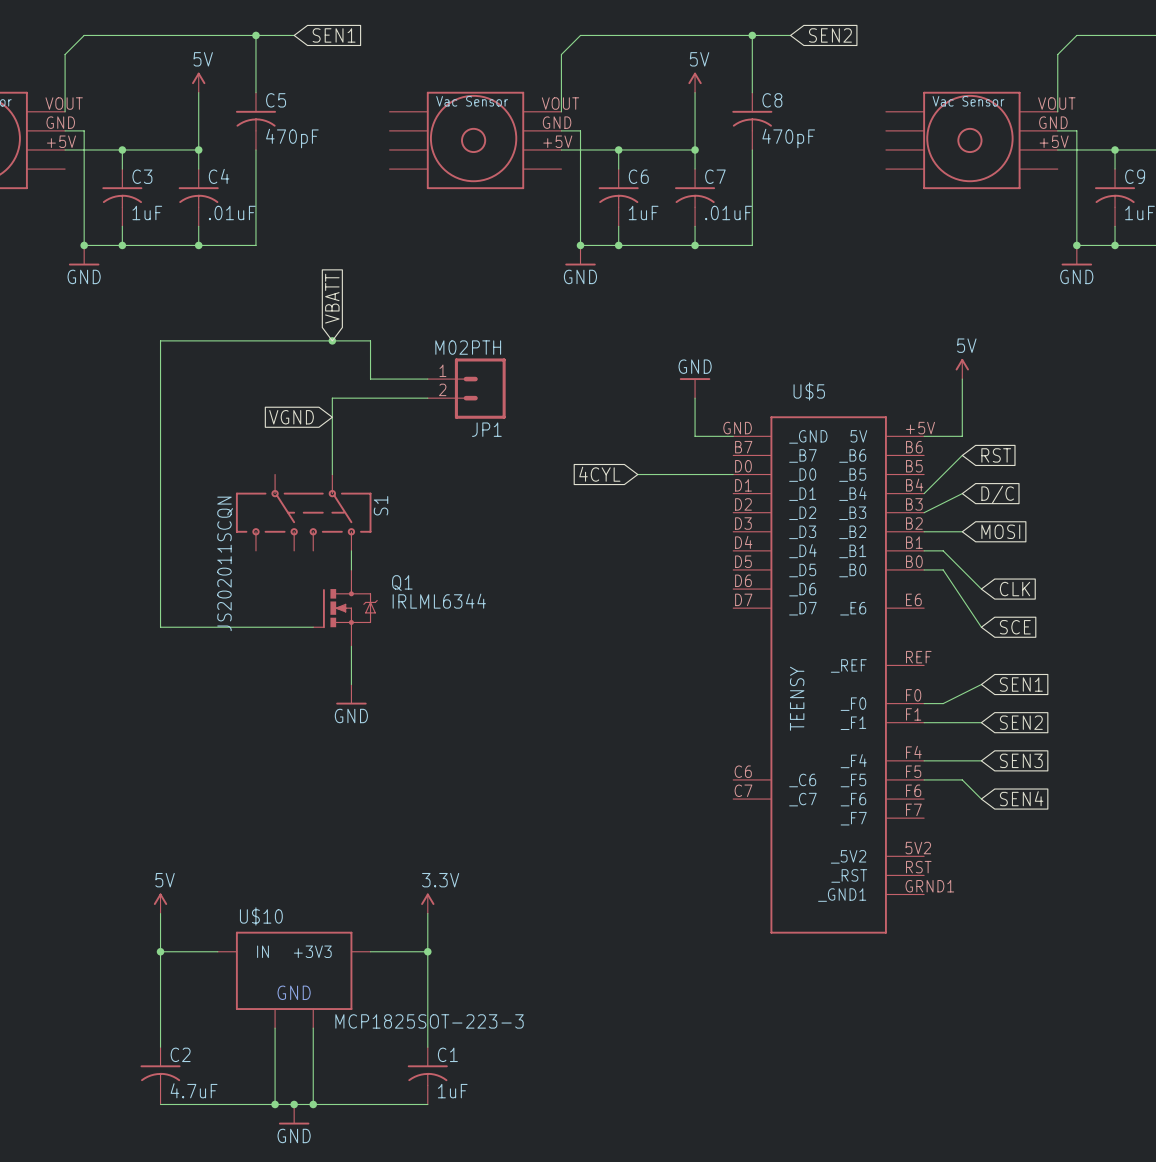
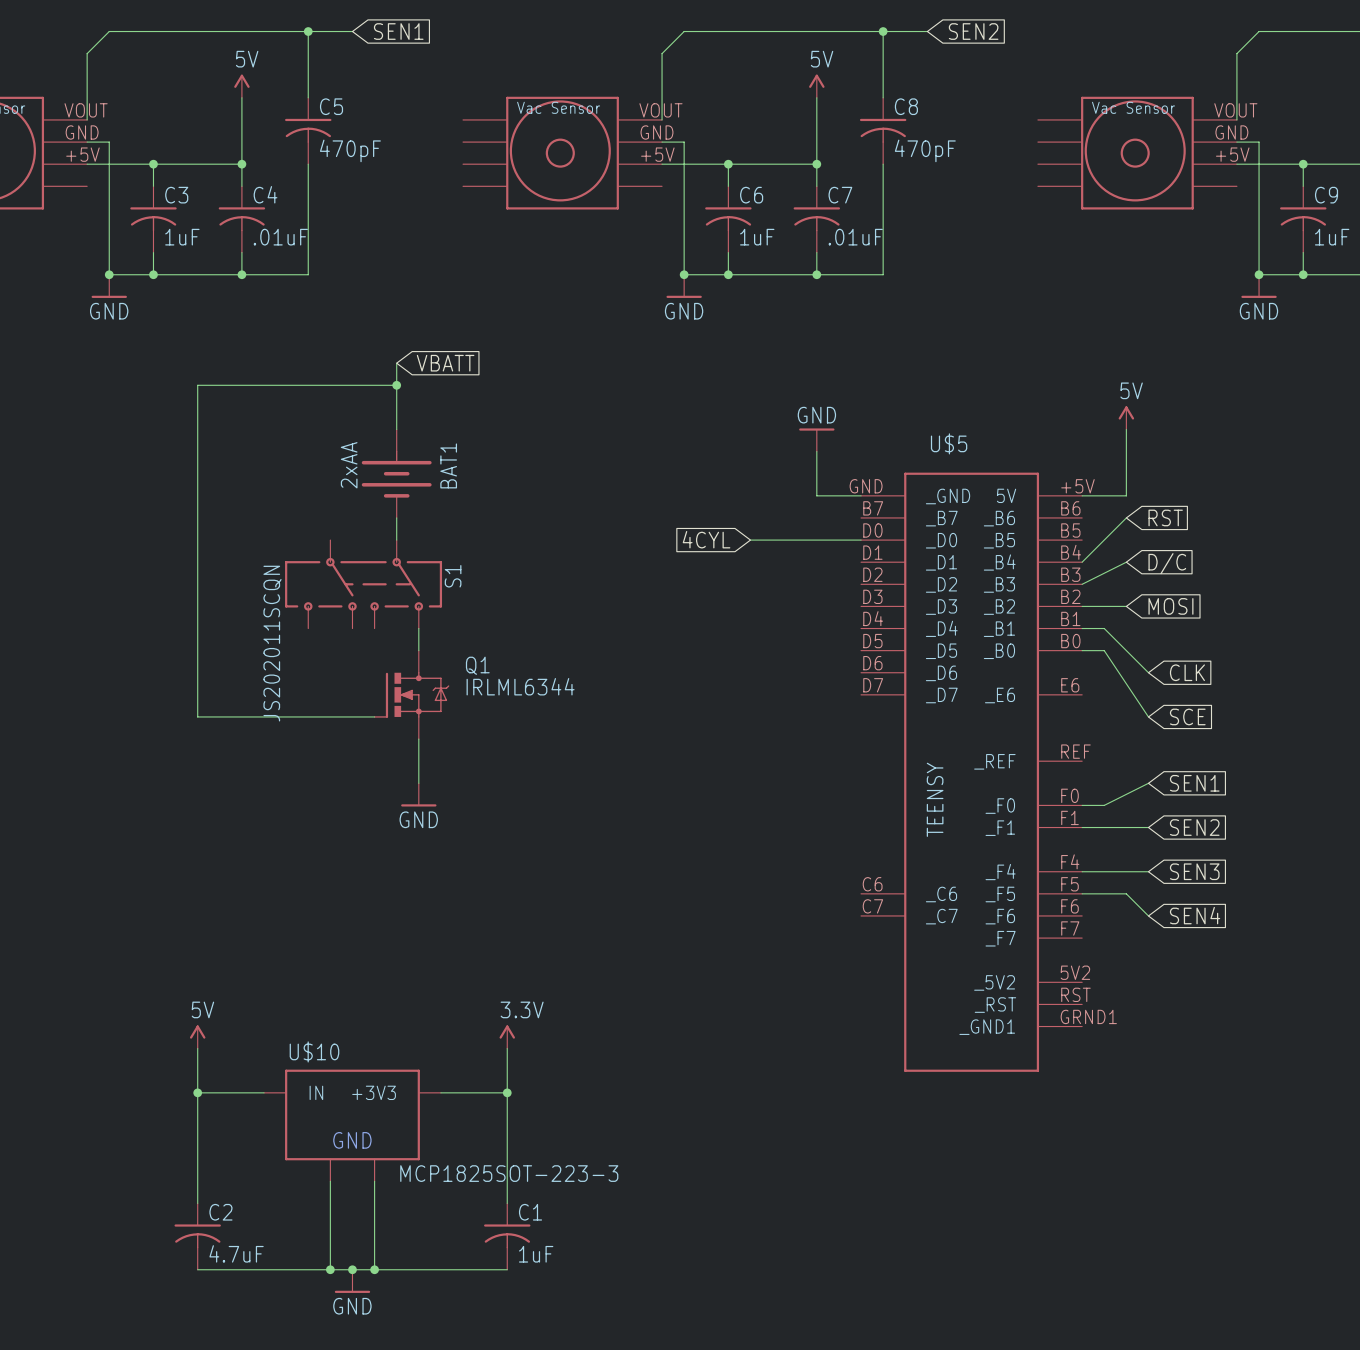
global label rotation: 0° (332, 298) -> 90° clockwise (445, 363)
wire: none -> (396, 363) (396, 429)
wire: (332, 340) (370, 340) (370, 379) (427, 379) -> none
JP1: M02PTH (466, 388) -> none
wire: (427, 398) (332, 398) (332, 455) -> none
global label: VGND (291, 417) -> none
BAT1: none -> 2xAA (396, 473)

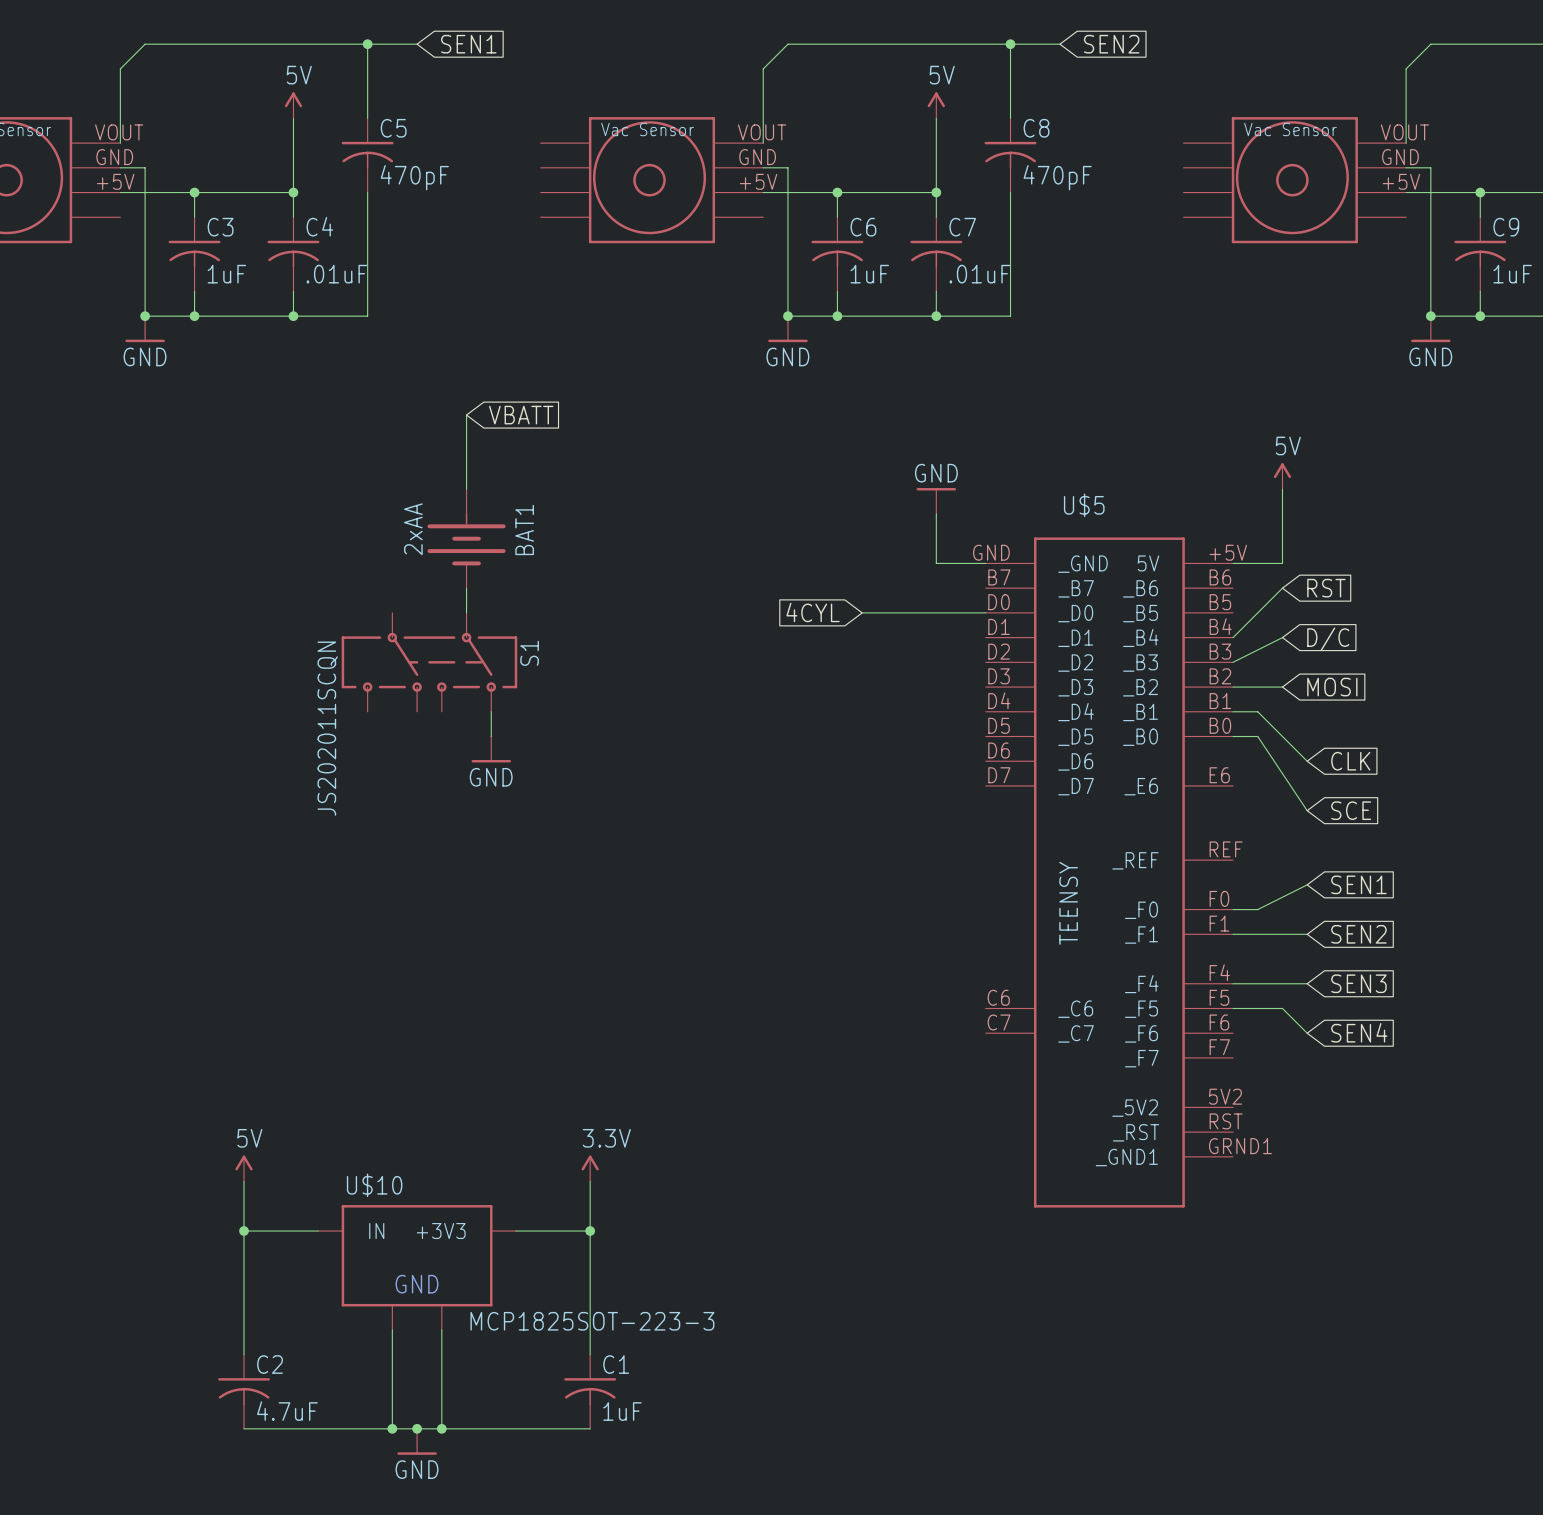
wire: (396, 385) (197, 385) (197, 716) (374, 716) -> none
junction: (396, 385) -> none
Q1: IRLML6344 (411, 694) -> none
wire: (418, 739) (418, 783) -> none
power symbol position: GND (418, 794) -> GND (491, 749)

